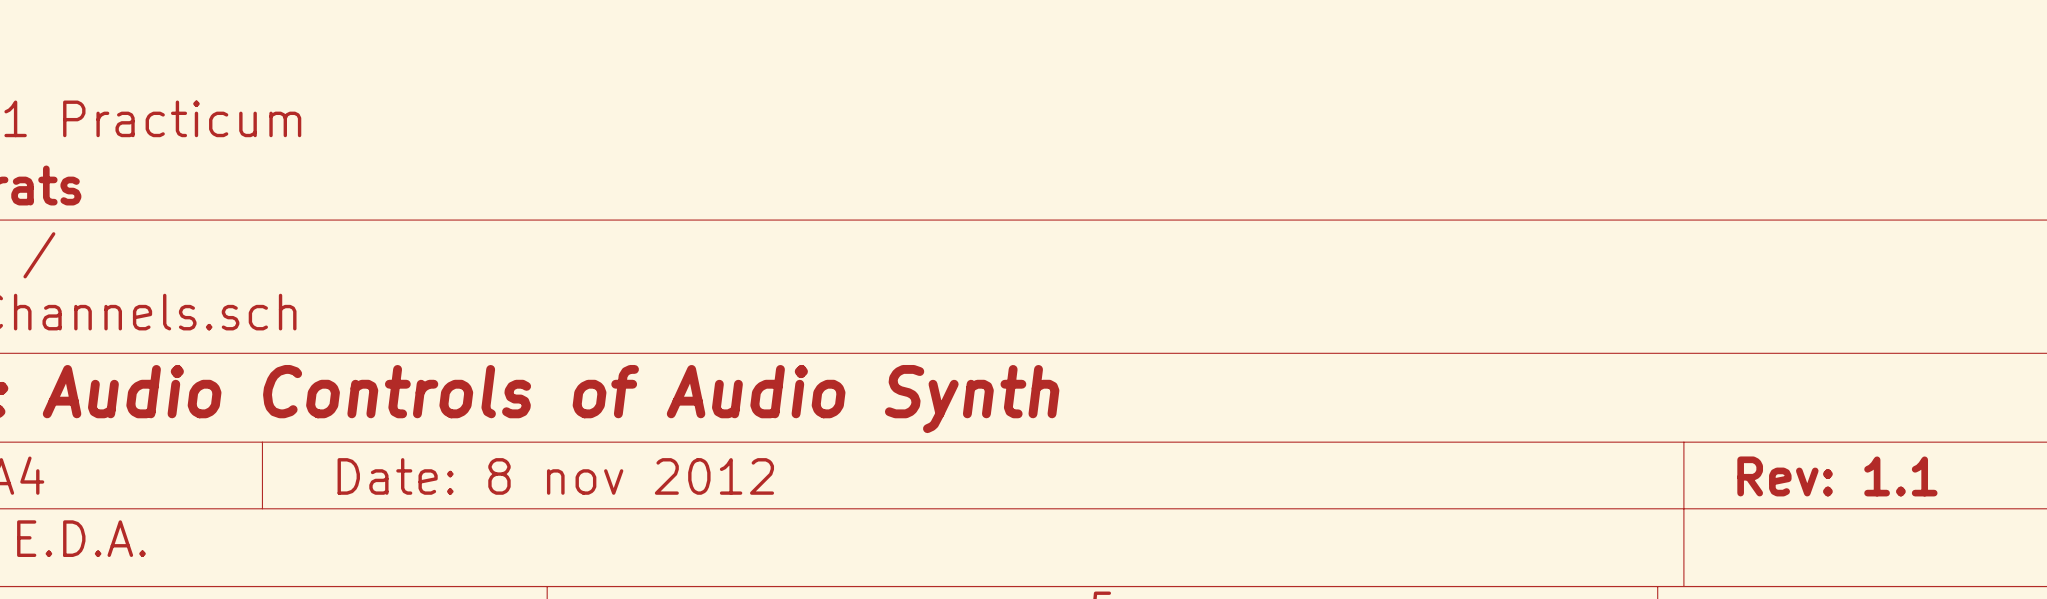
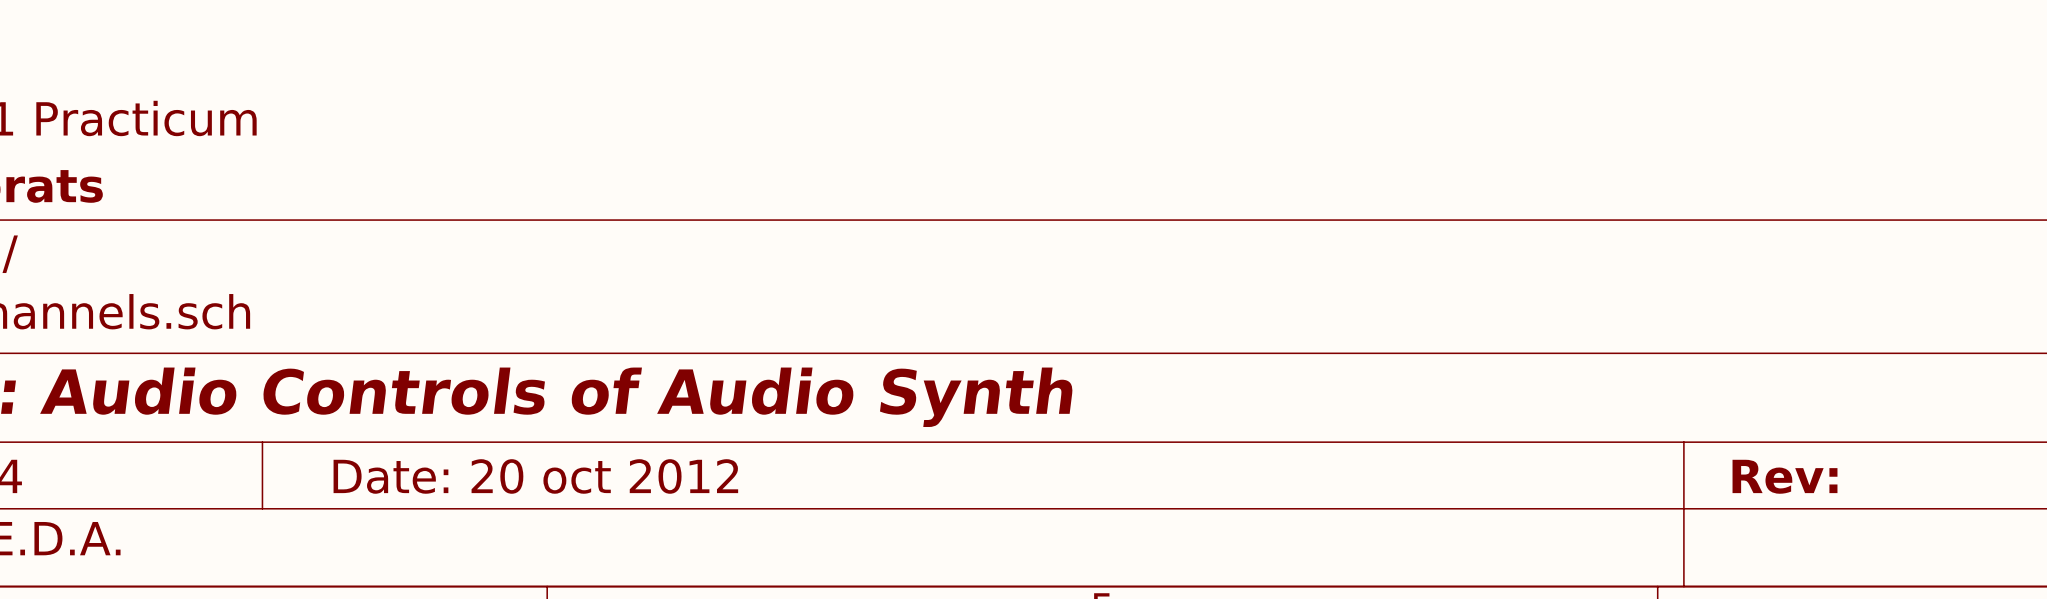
title block: Date: 8 nov 2012 (555, 476) -> Date: 20 oct 2012 (535, 476)
title block: Rev: 1.1 (1837, 476) -> Rev: (1785, 476)

